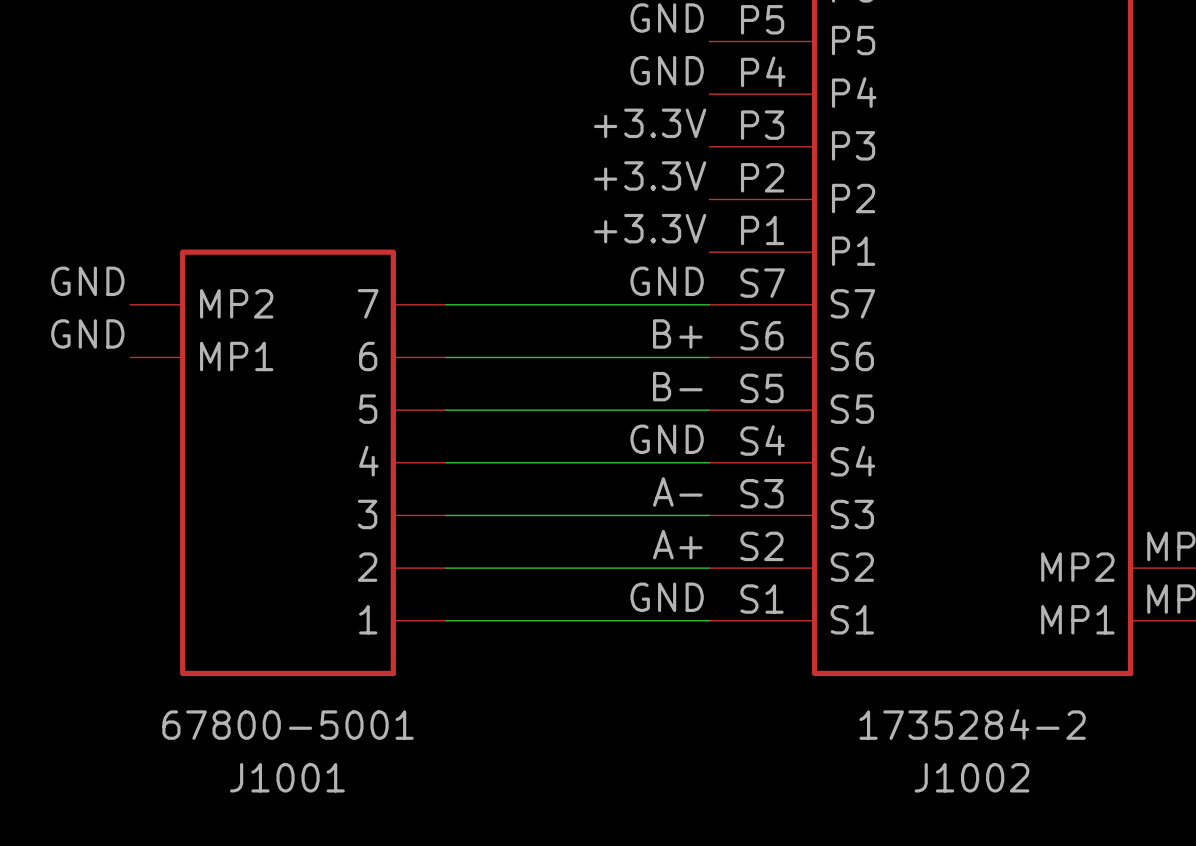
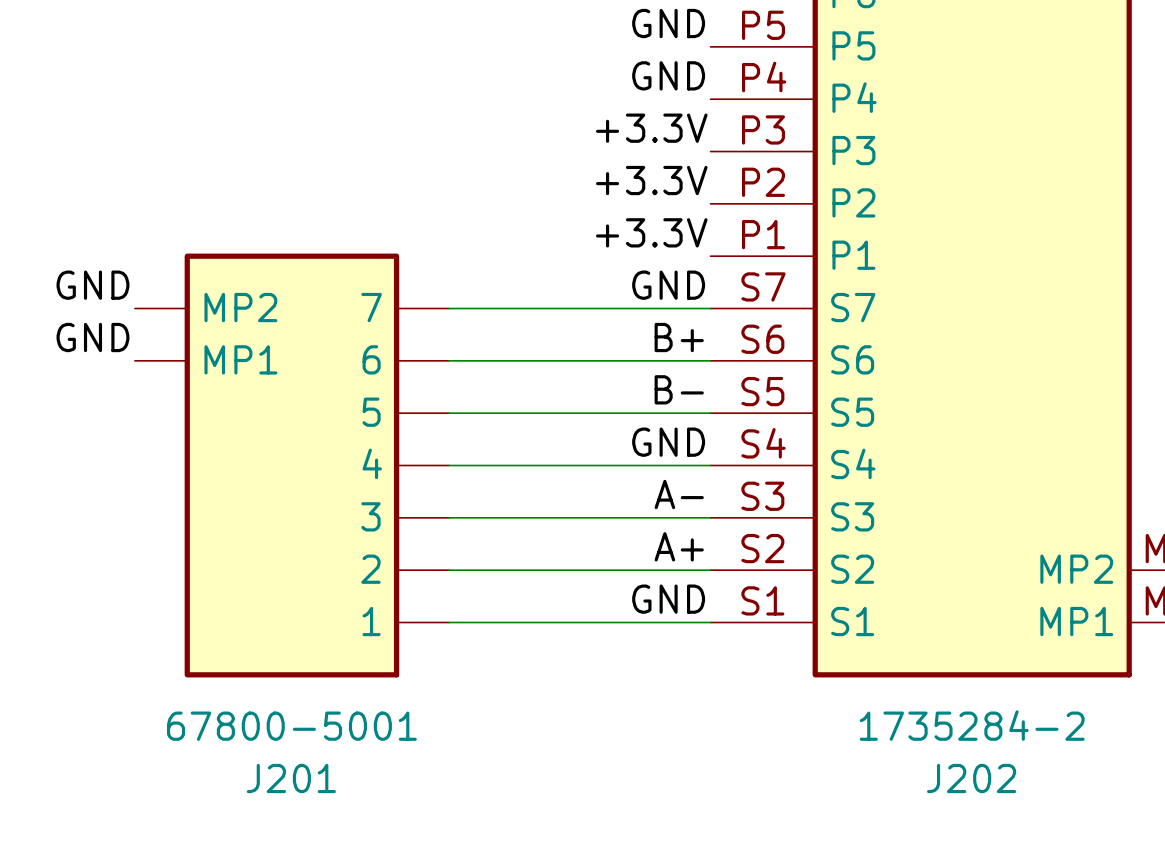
J1001 name: J1001 (287, 777) -> J201 (291, 778)
J1002 name: J1002 (971, 777) -> J202 (971, 778)

